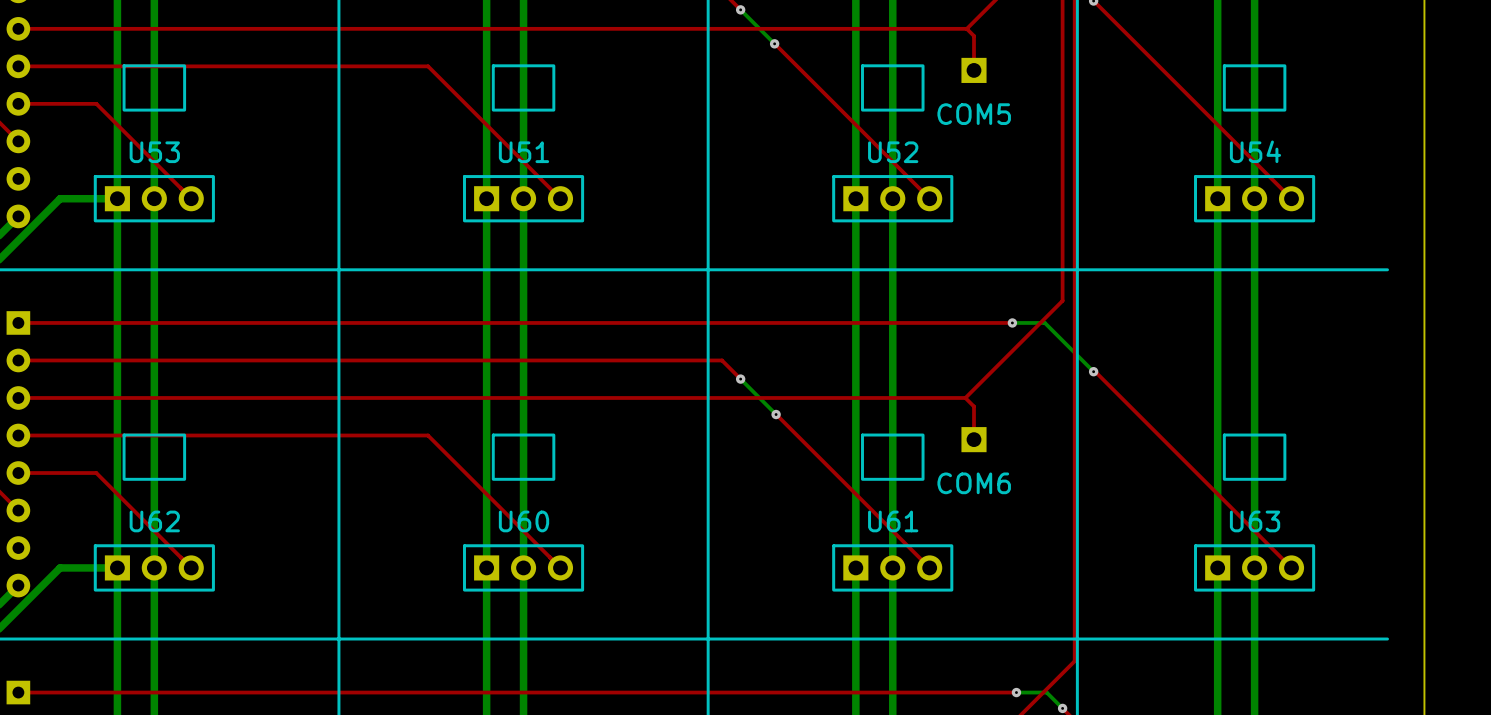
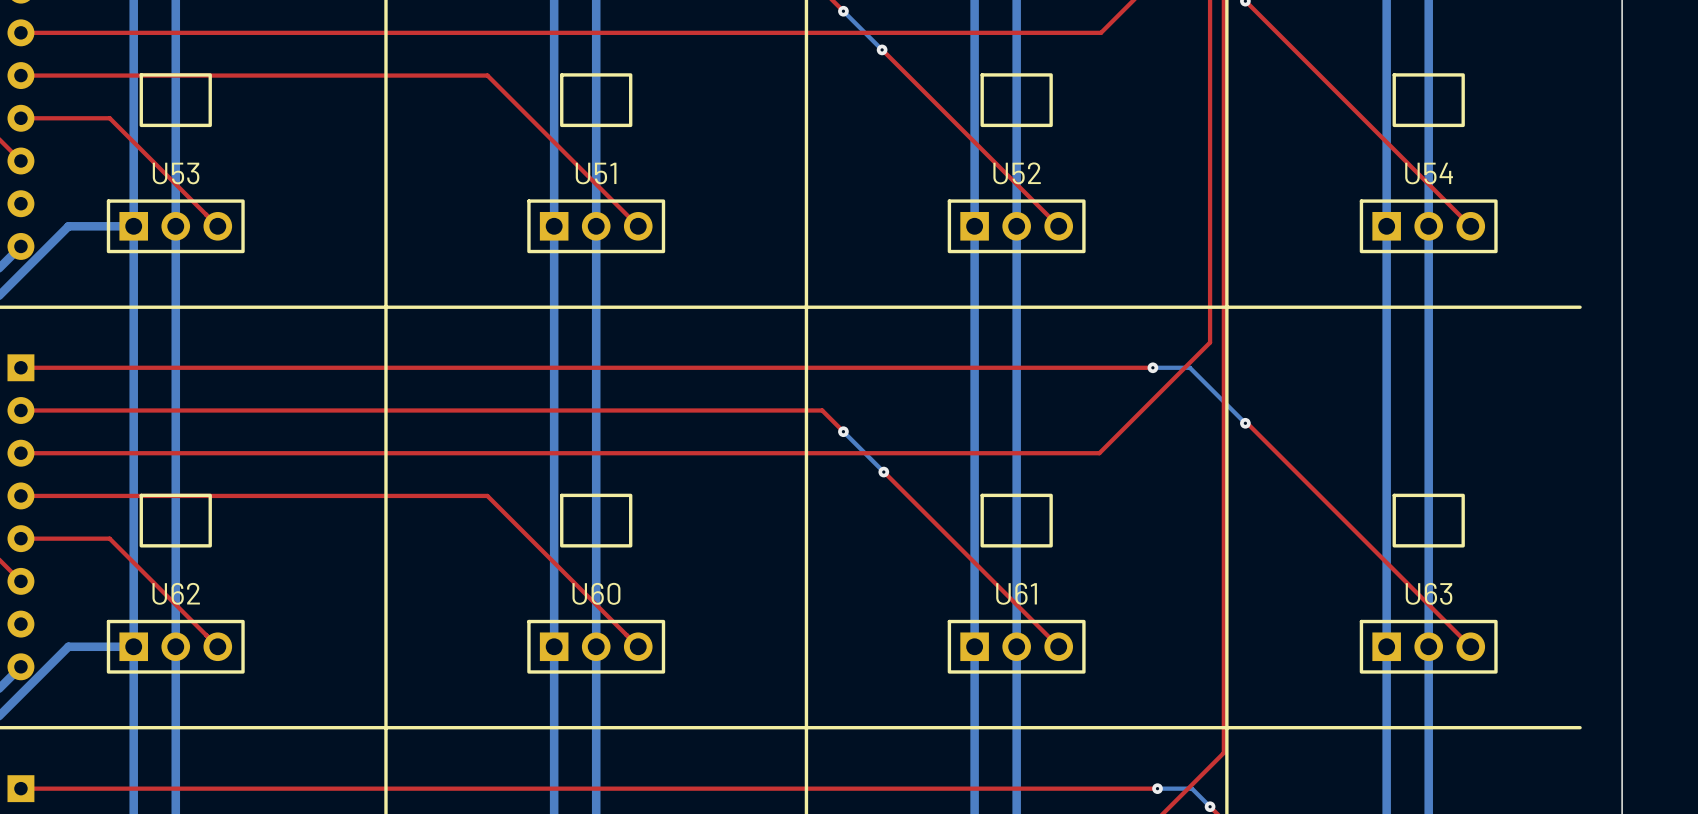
top track: (966, 28) (973, 36) (973, 70) -> none
part: (973, 70) -> none
text: COM5 (974, 114) -> none
top track: (965, 397) (973, 406) (973, 439) -> none
part: (973, 439) -> none
text: COM6 (974, 483) -> none

